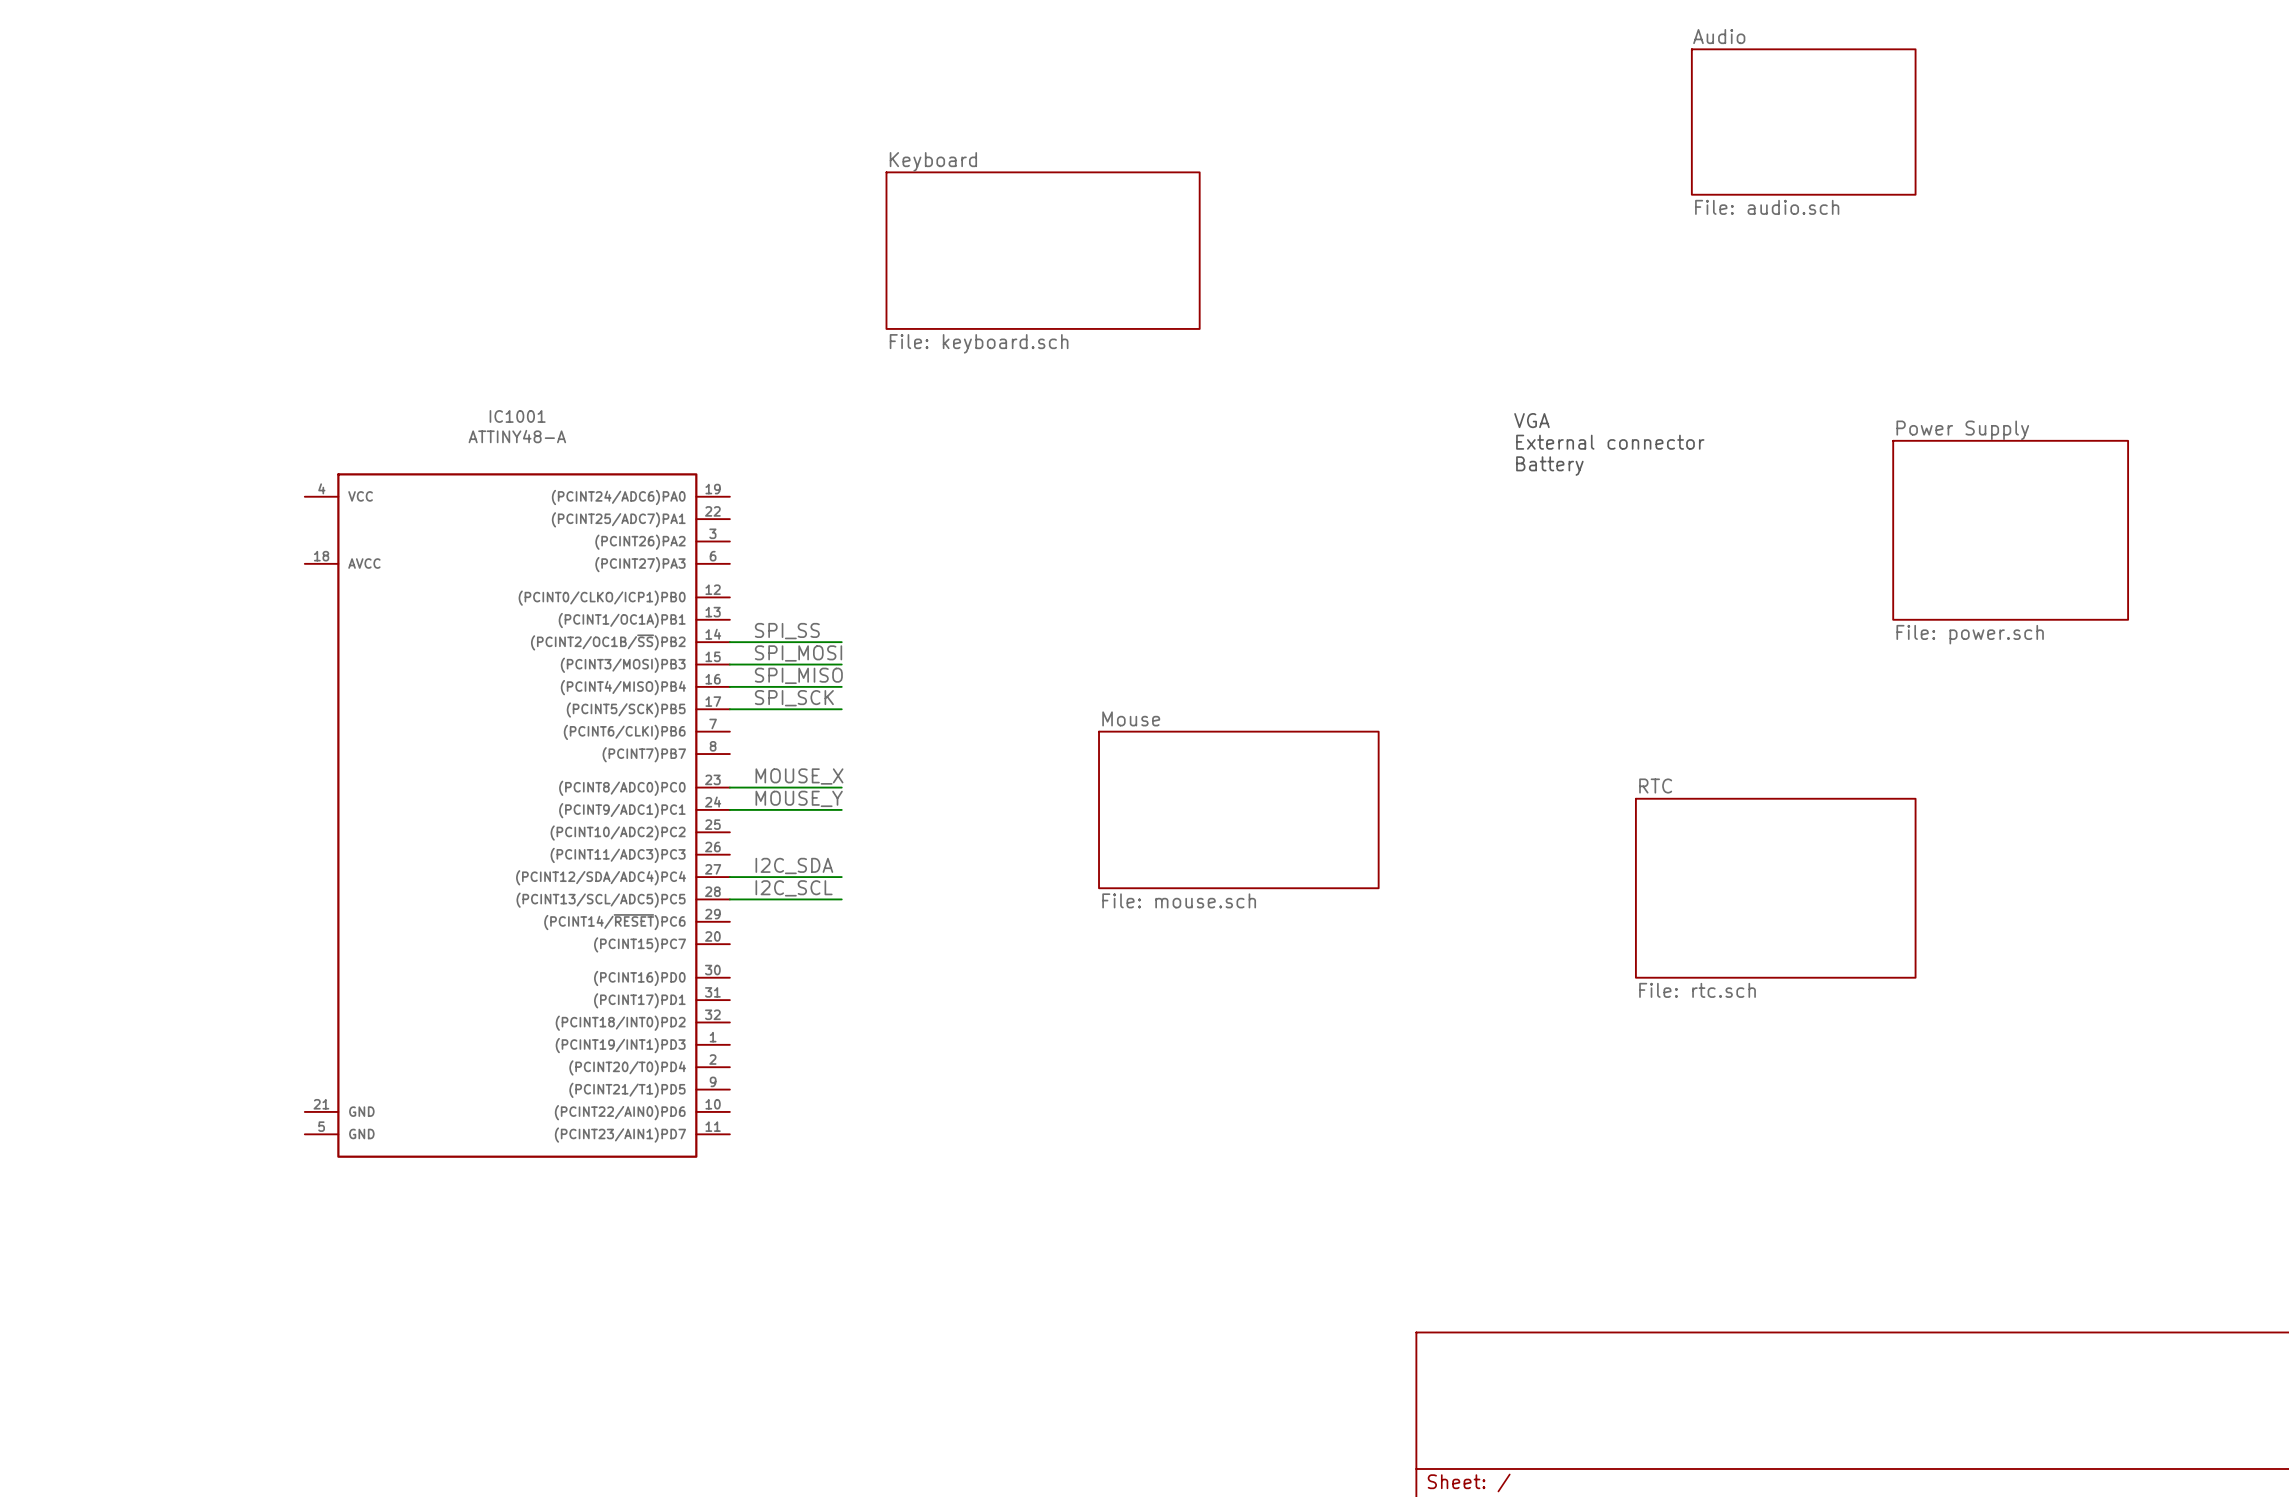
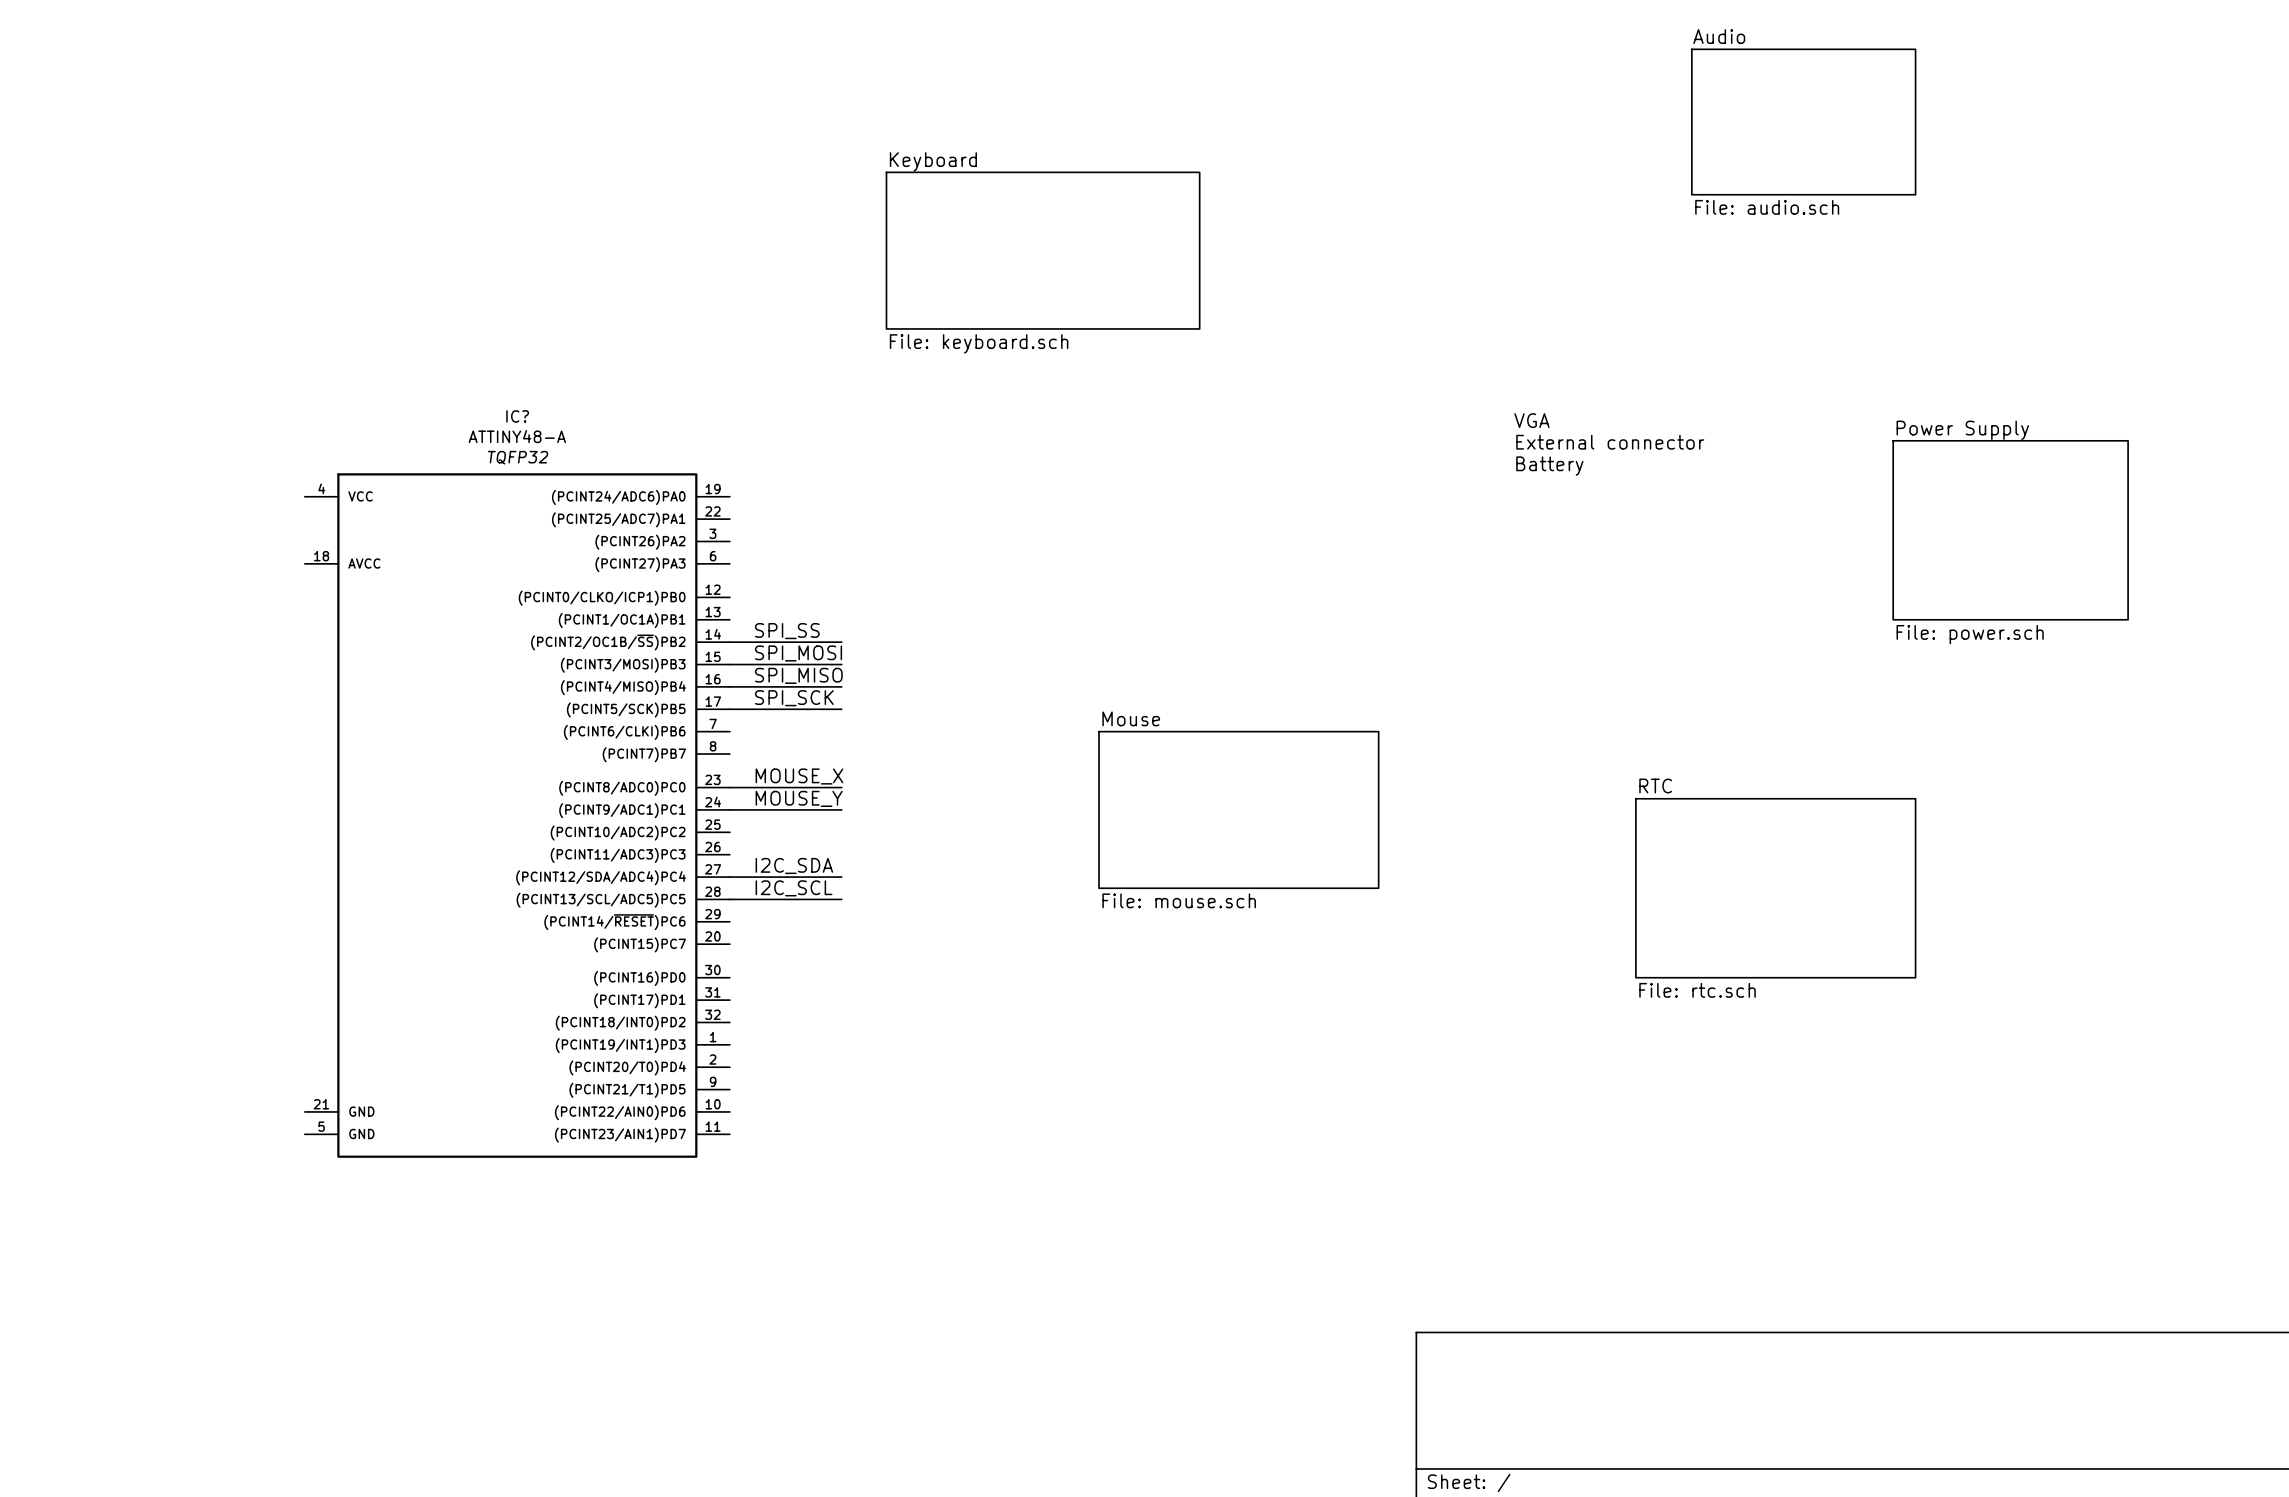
IC1001 name: IC1001 (517, 416) -> IC? (517, 416)
IC1001 text: none -> TQFP32 (518, 457)

